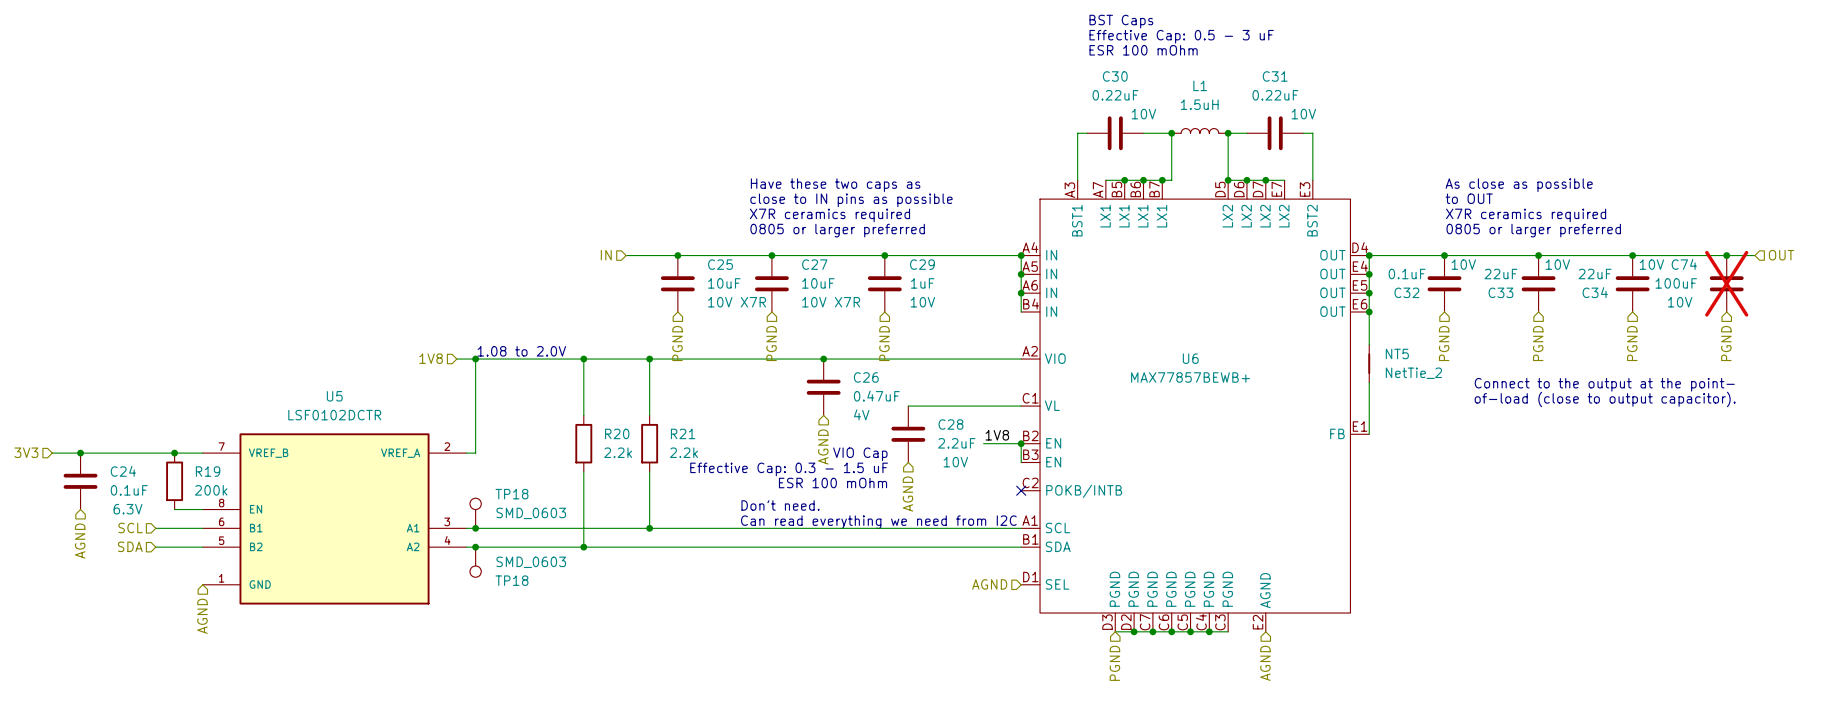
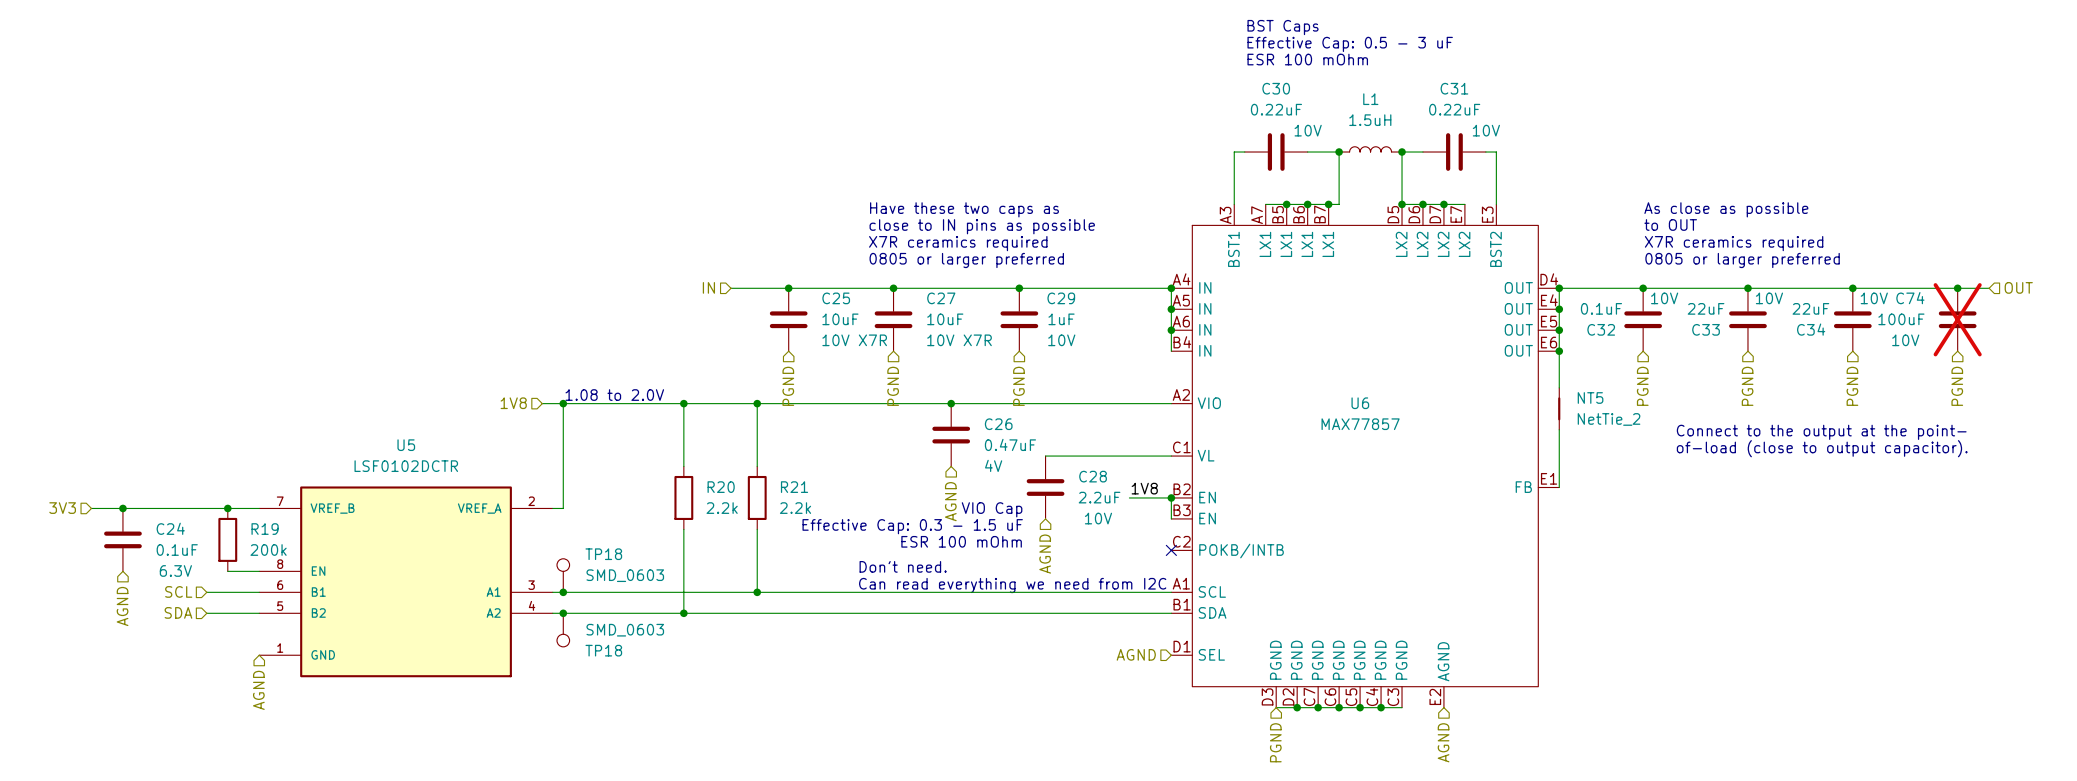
U6 value: MAX77857BEWB+ (1190, 377) -> MAX77857 (1360, 424)

